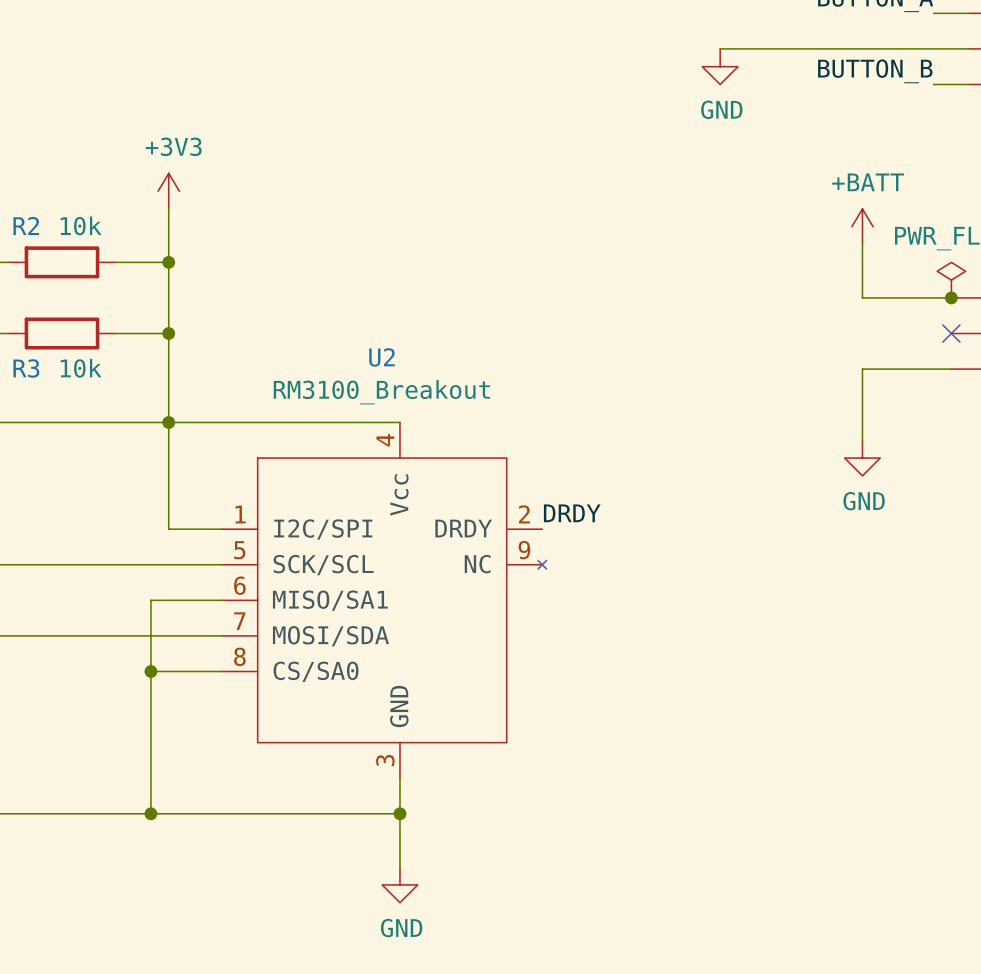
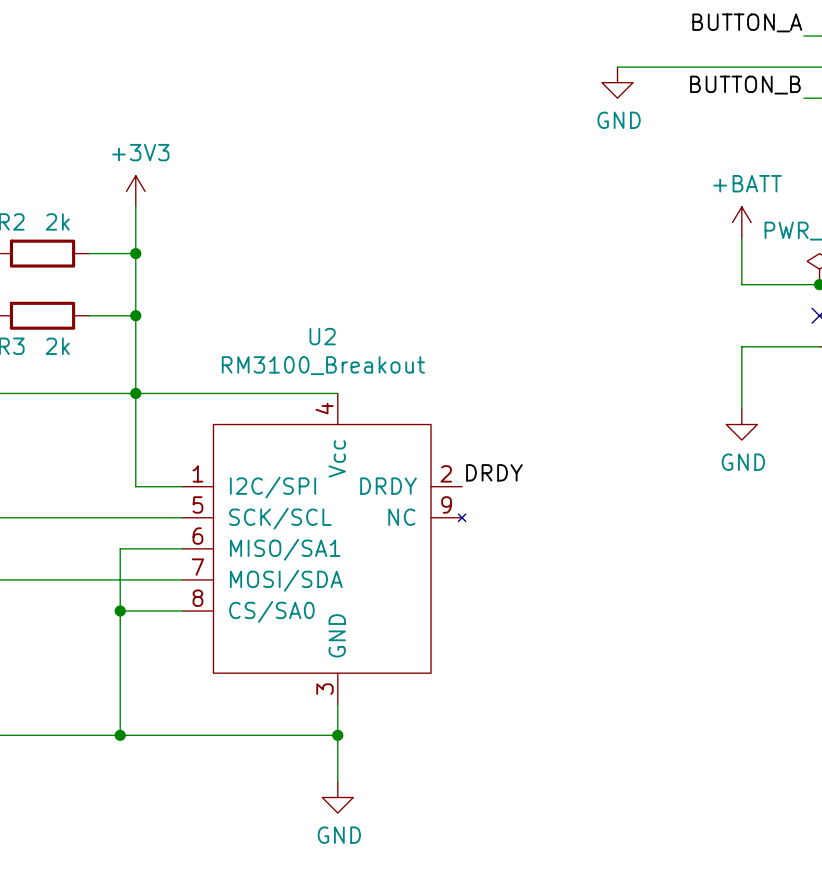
R2 value: 10k (81, 225) -> 2k (57, 221)
R3 value: 10k (81, 368) -> 2k (57, 346)

